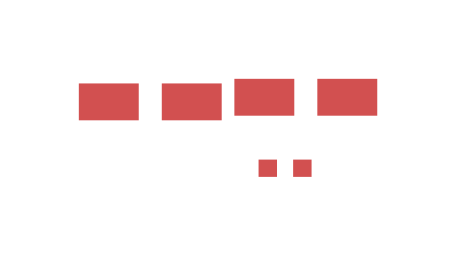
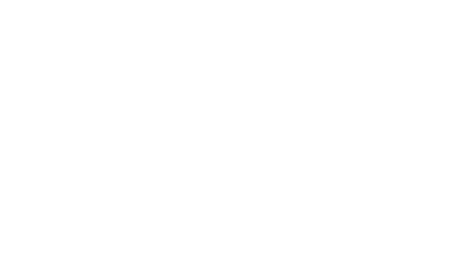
part: (305, 97) -> none
part: (150, 101) -> none
part: (285, 168) -> none

